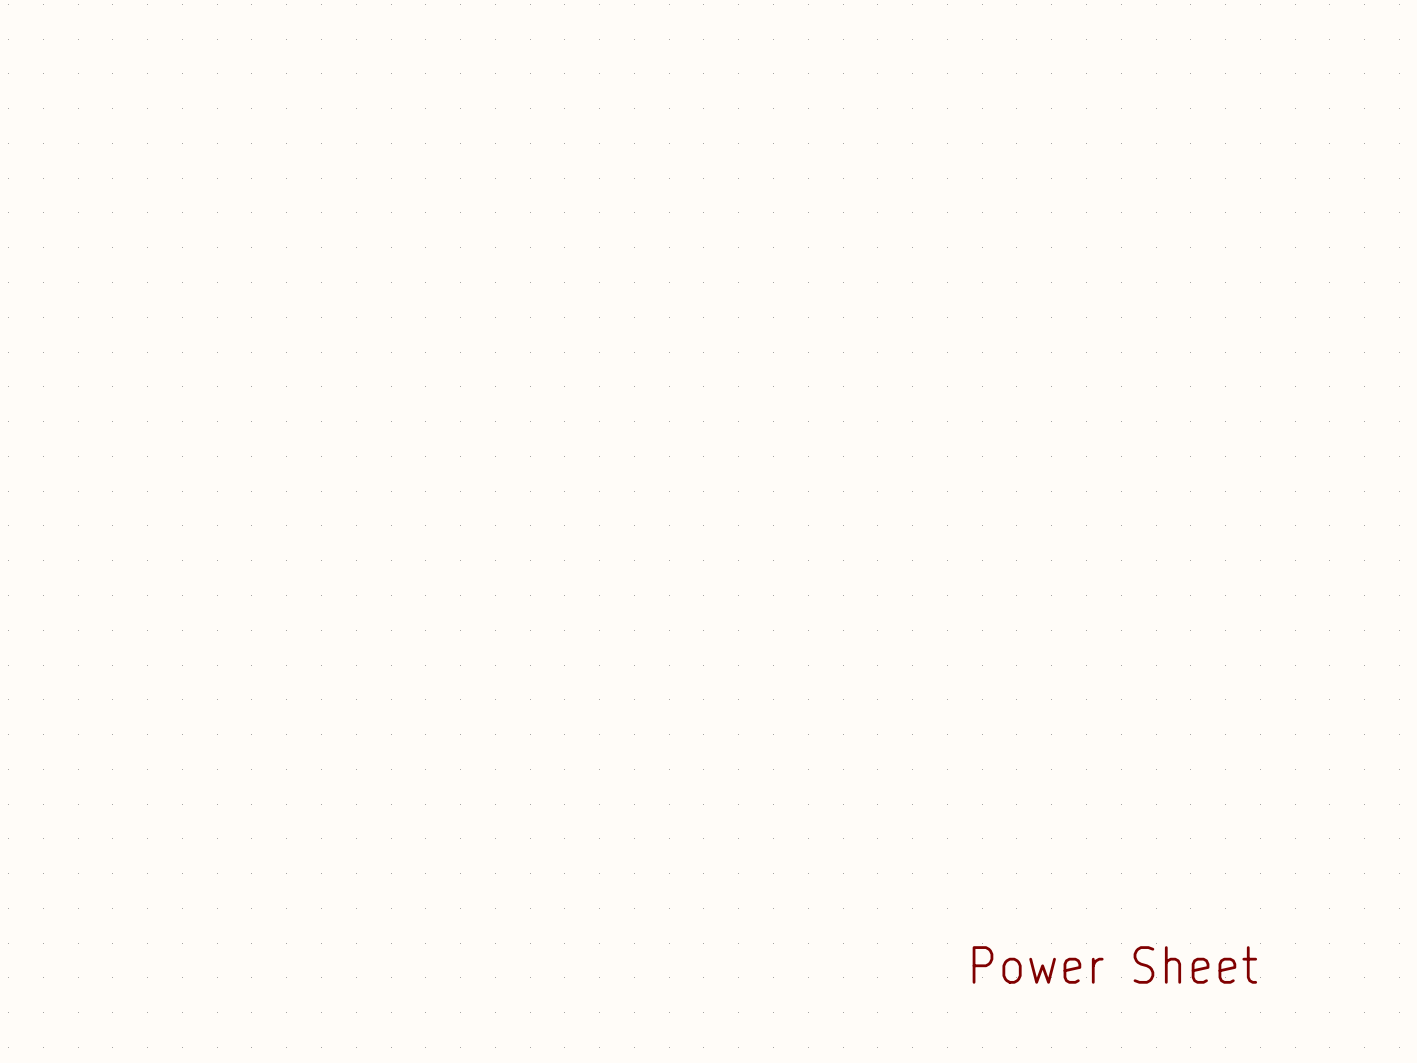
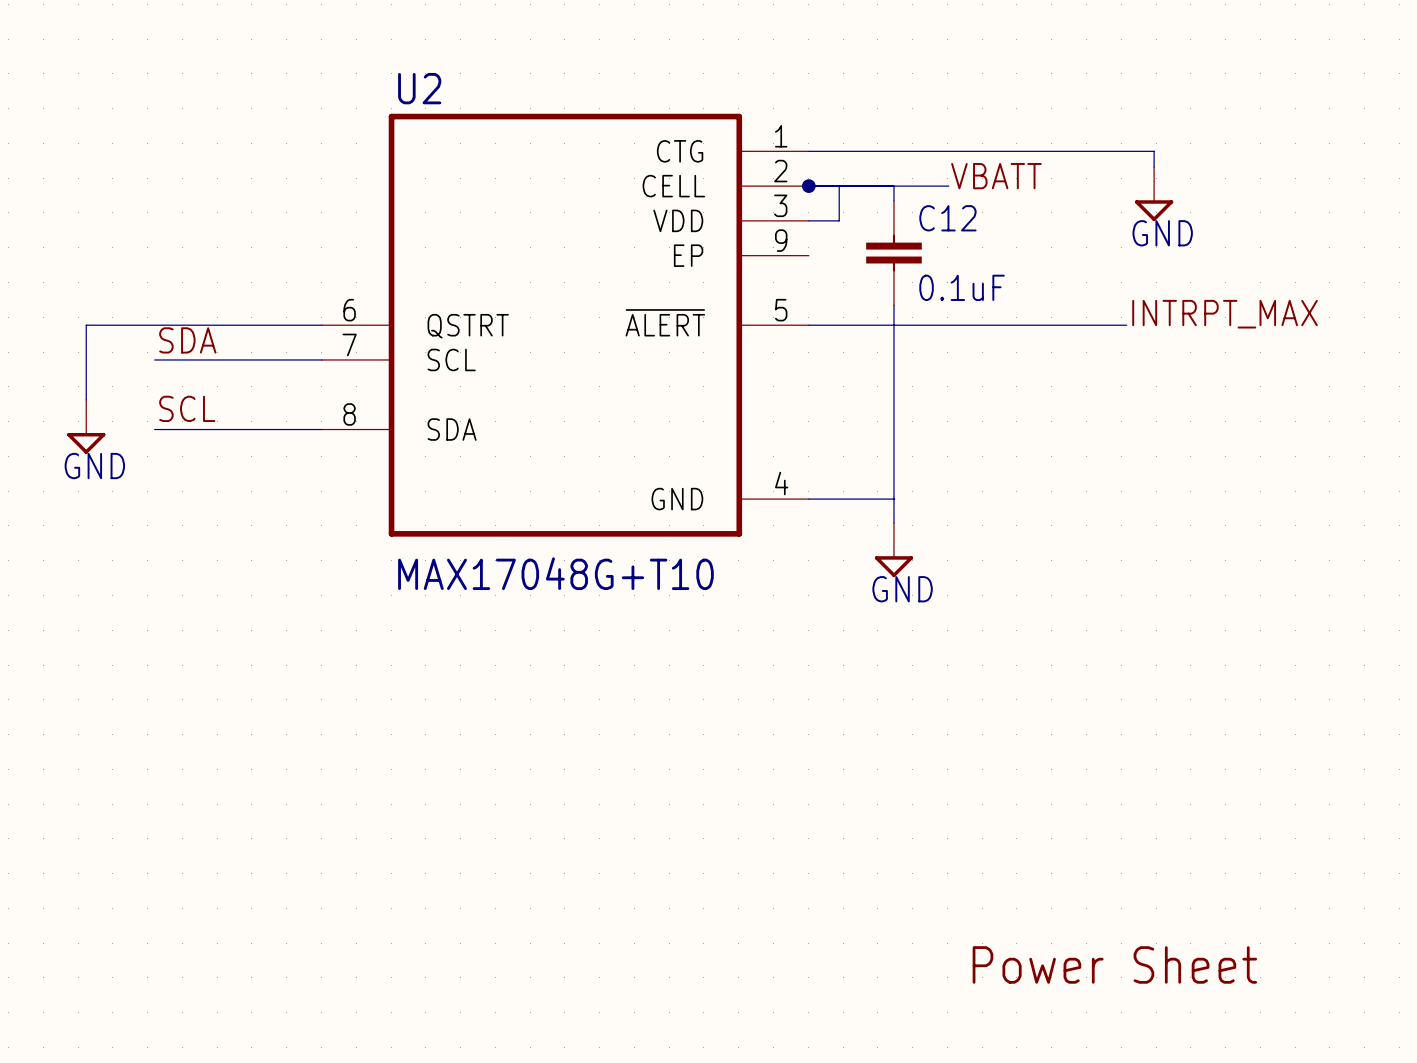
wire: none -> (808, 151) (1154, 151) (1154, 167)
label: none -> VBATT (996, 176)
wire: none -> (808, 186) (948, 186)
junction: none -> (808, 186)
wire: none -> (839, 186) (839, 220) (808, 220)
wire: none -> (893, 186) (893, 200)
power symbol: none -> GND (1154, 194)
C12: none -> 0.1uF (893, 253)
wire: none -> (893, 305) (893, 523)
label: none -> INTRPT_MAX (1225, 314)
wire: none -> (322, 325) (86, 325) (86, 399)
U2: none -> MAX17048G+T10 (565, 325)
wire: none -> (808, 325) (1126, 325)
label: none -> SDA (187, 340)
wire: none -> (154, 359) (322, 359)
label: none -> SCL (187, 408)
power symbol: none -> GND (86, 426)
wire: none -> (154, 429) (322, 429)
wire: none -> (808, 499) (893, 499)
power symbol: none -> GND (893, 550)

